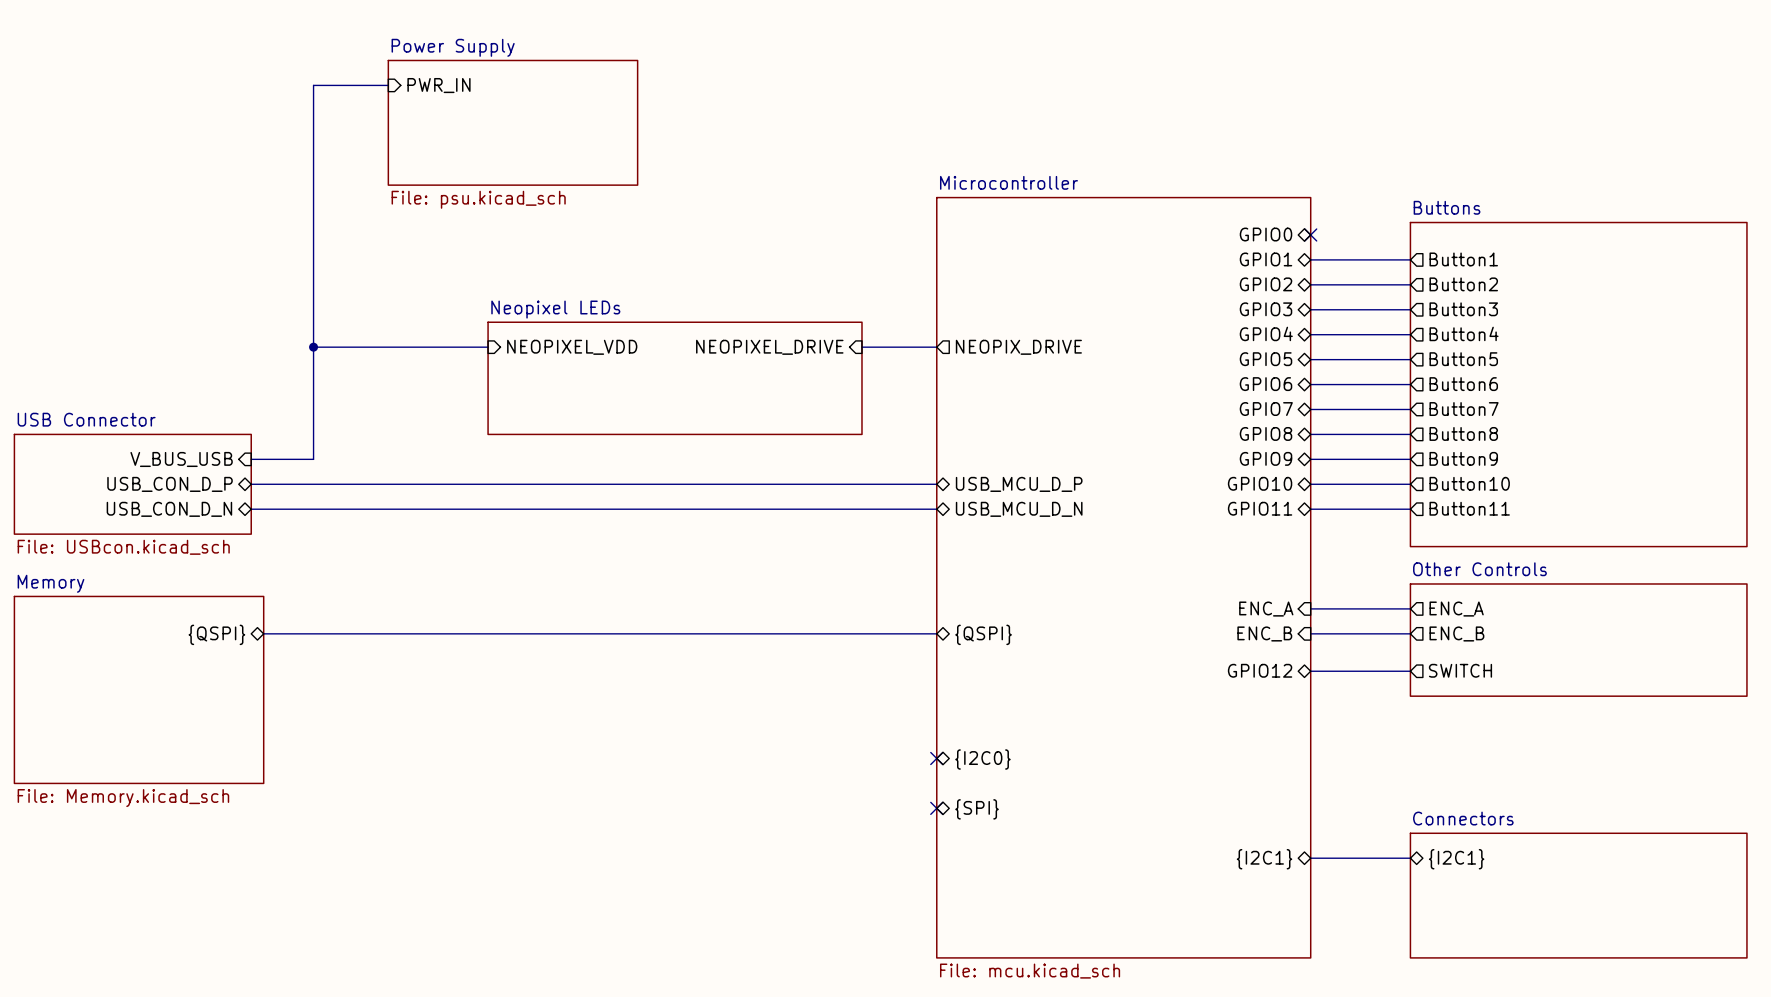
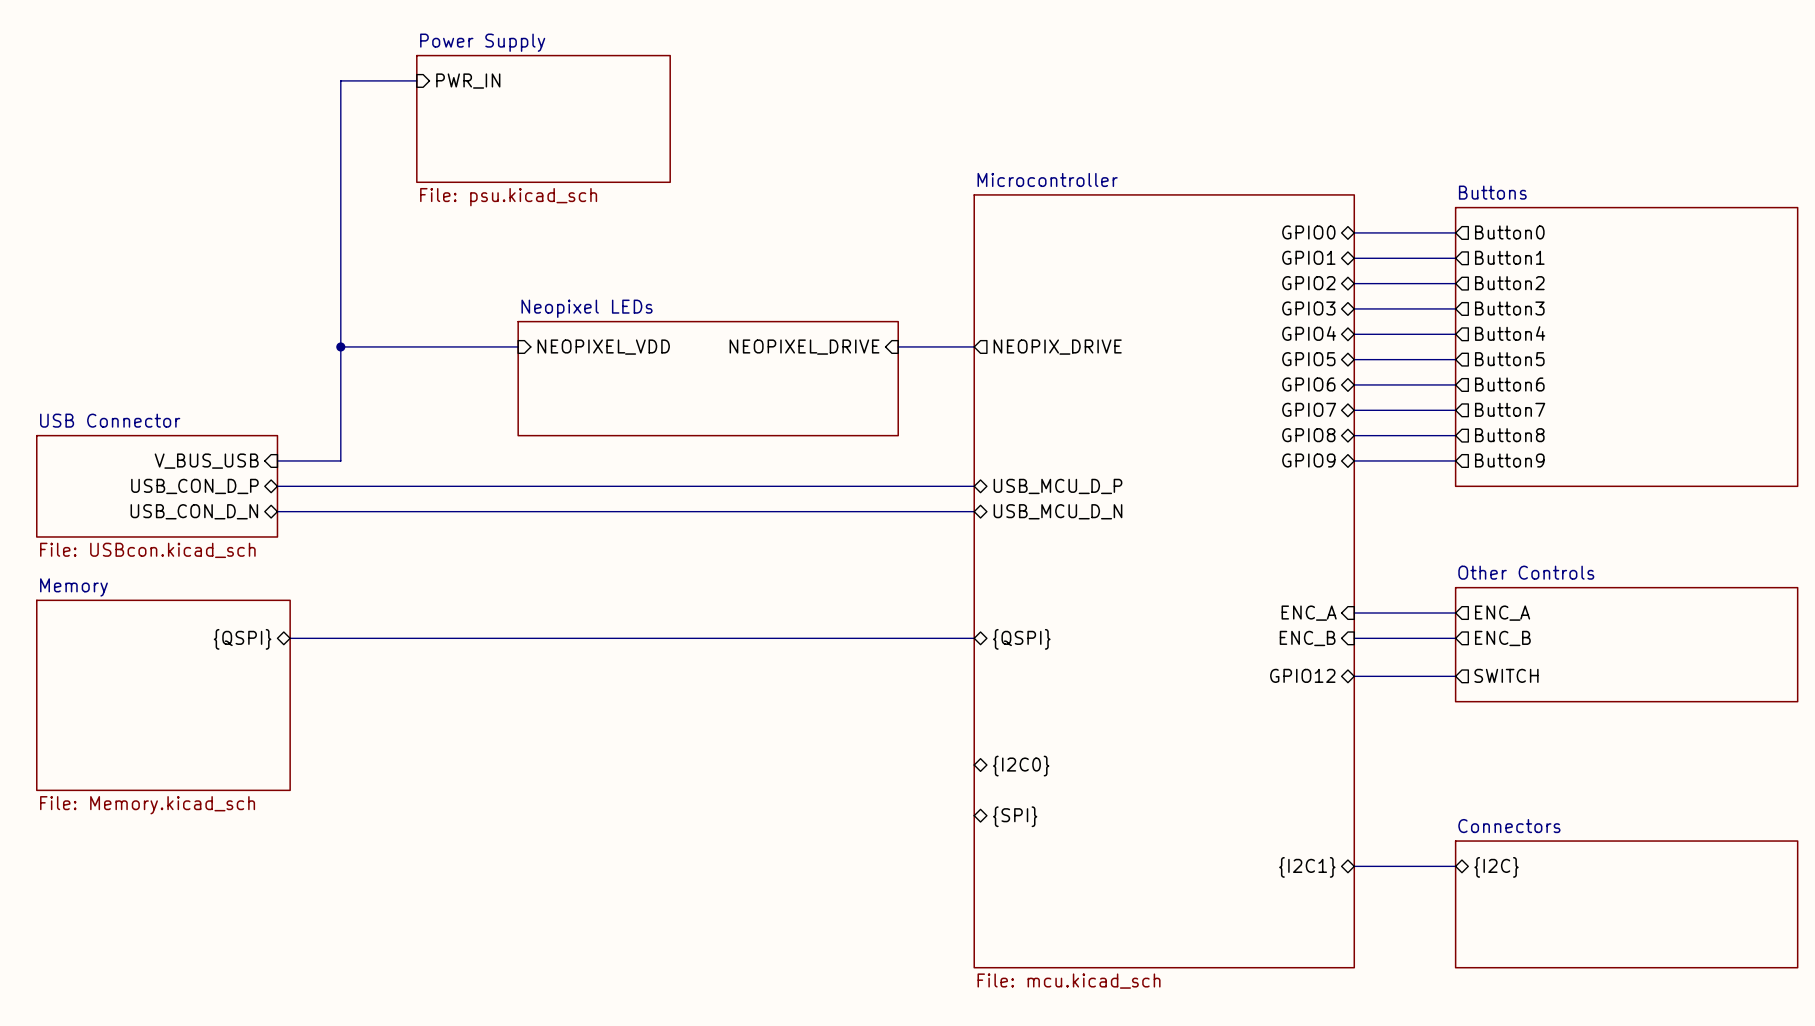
wire: none -> (1354, 232) (1455, 232)
no-connect mark: (1310, 234) -> none
sheet pin: none -> Button0 (1509, 232)
sheet Buttons: none -> (1626, 346)
sheet Buttons: (1578, 384) -> none
sheet pin: GPIO10 (1260, 483) -> none
sheet pin: Button10 (1469, 483) -> none
wire: (1310, 484) (1410, 484) -> none
sheet pin: GPIO11 (1260, 508) -> none
sheet pin: Button11 (1469, 508) -> none
wire: (1310, 509) (1410, 509) -> none
no-connect mark: (936, 758) -> none
no-connect mark: (936, 808) -> none
sheet pin: {I2C1} (1456, 859) -> {I2C} (1496, 867)

